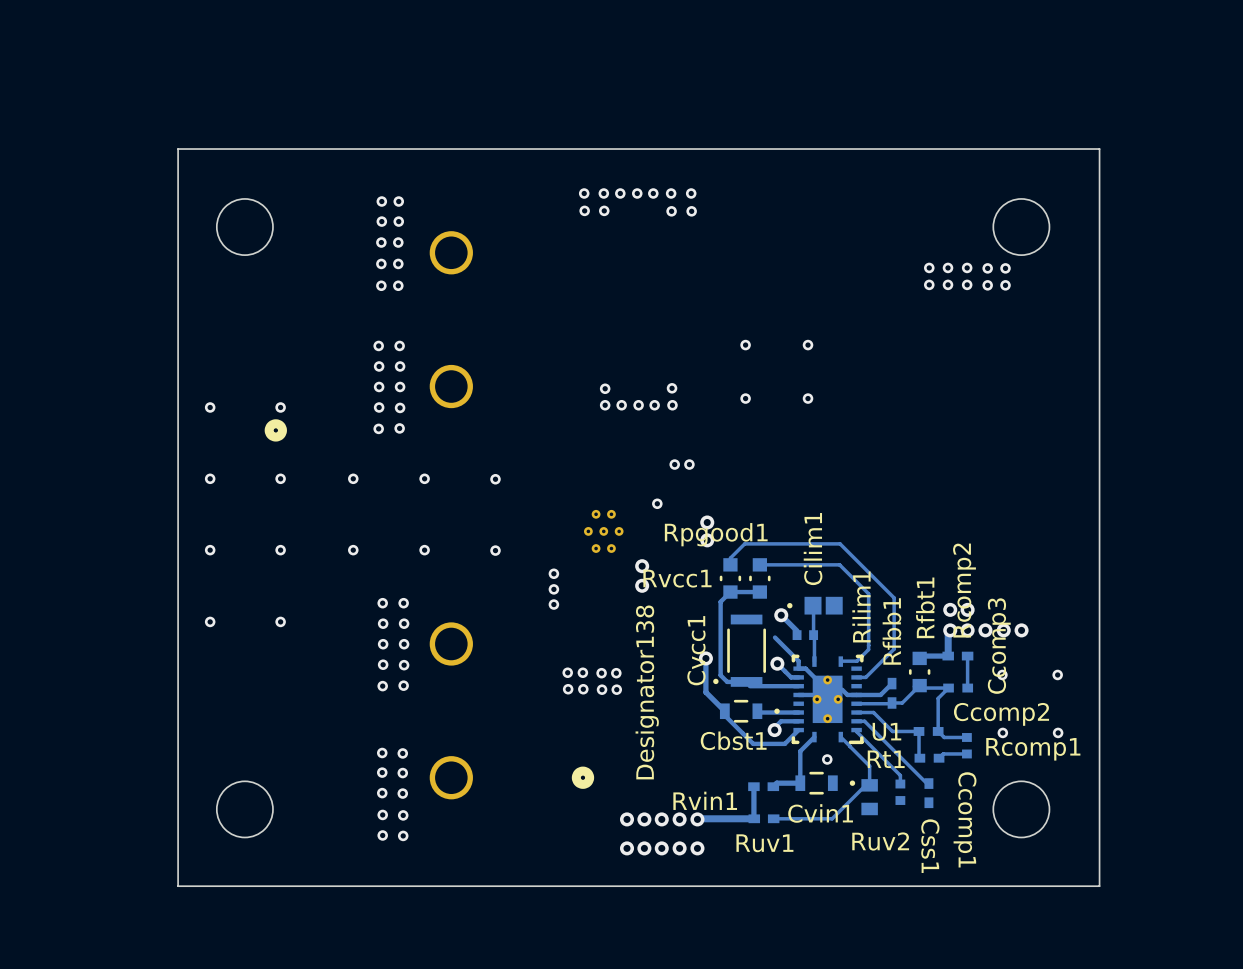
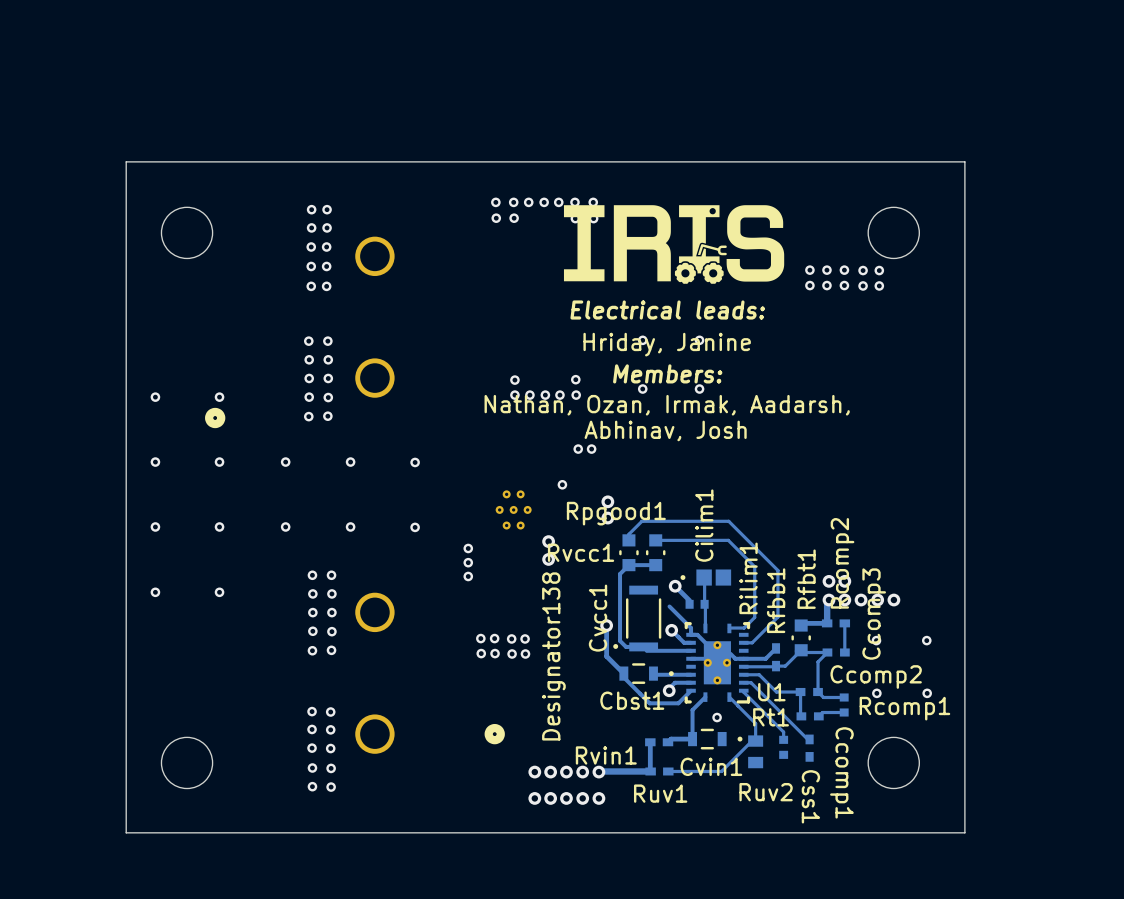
drawing: none -> [563, 205, 785, 284]
text: none -> Electrical leads: (667, 310)
text: none -> Hriday, Janine (667, 344)
text: none -> Members: (667, 373)
text: none -> Nathan, Ozan, Irmak, Aadarsh, (667, 405)
text: none -> Abhinav, Josh (665, 430)

